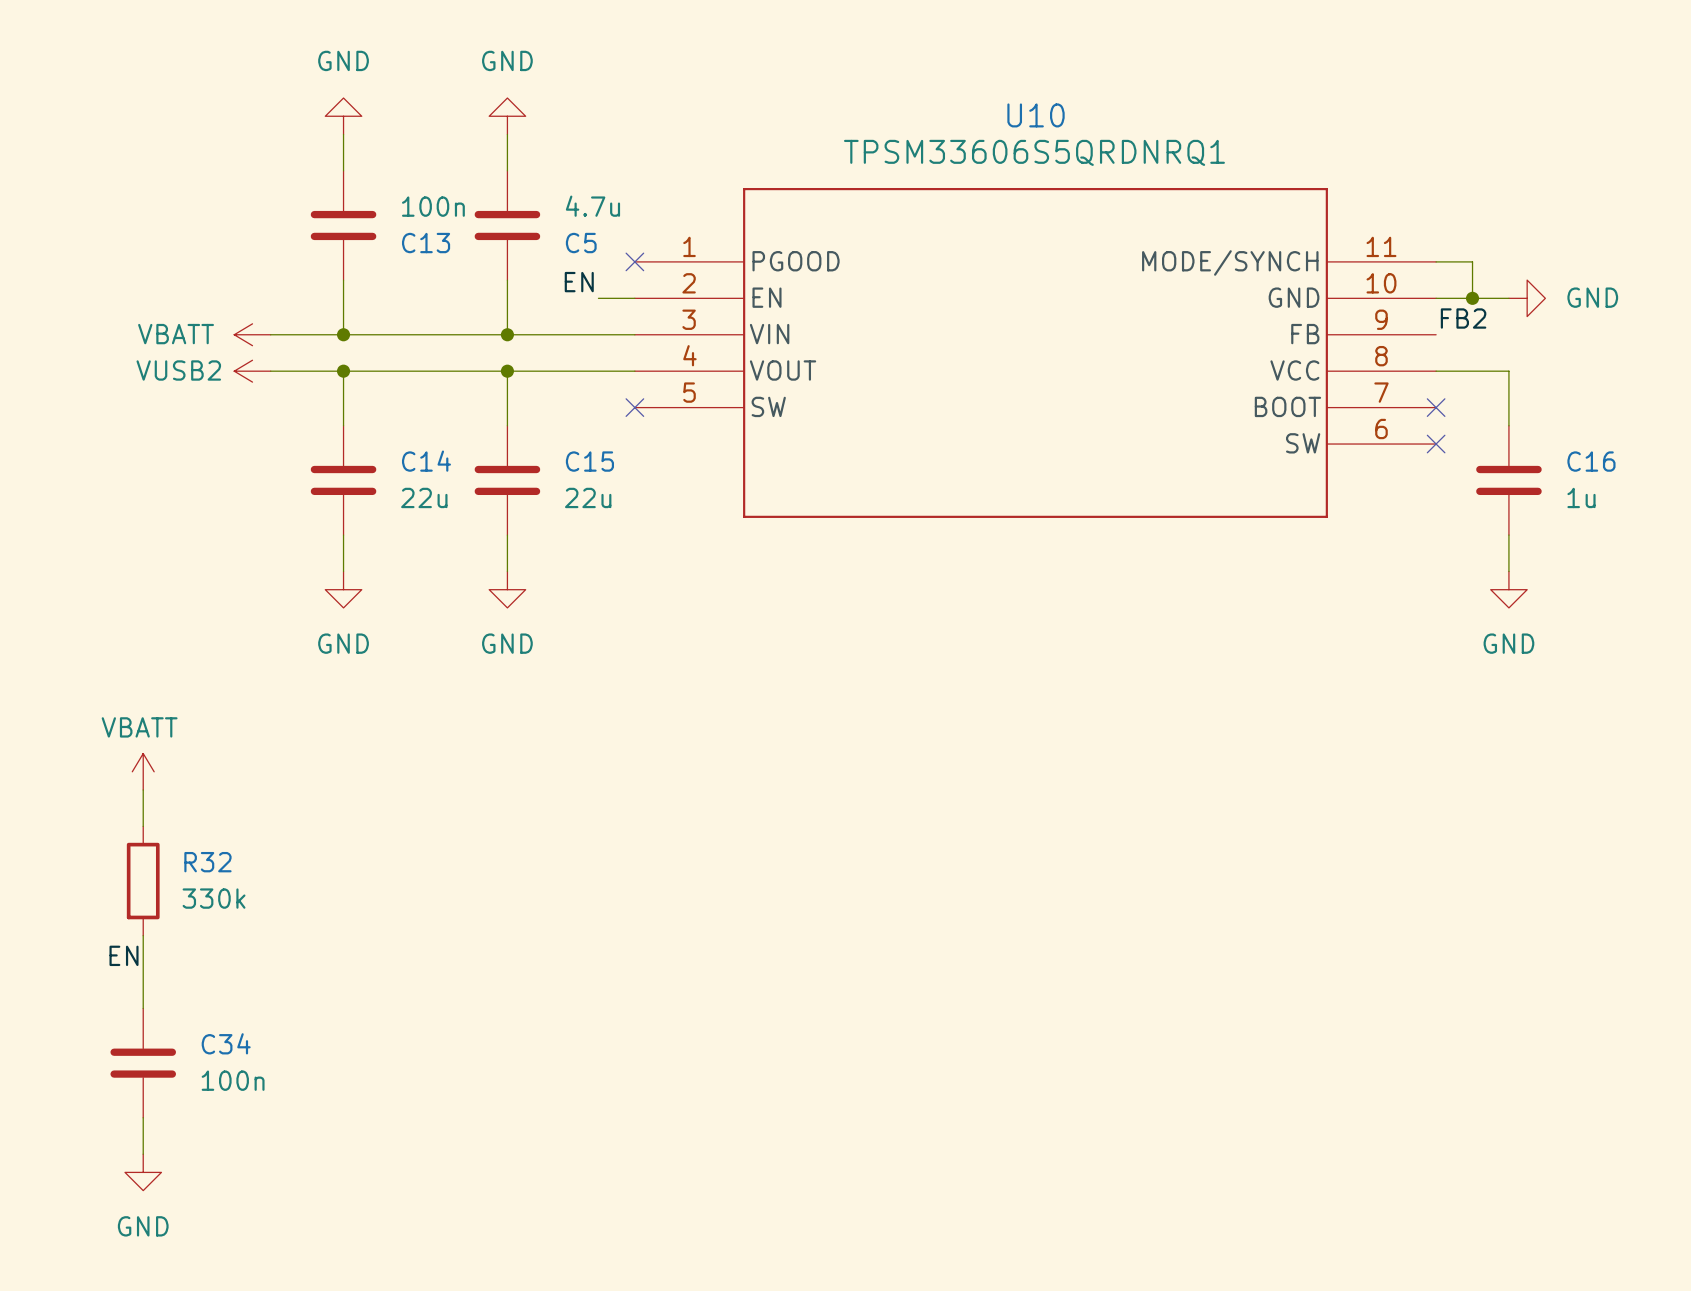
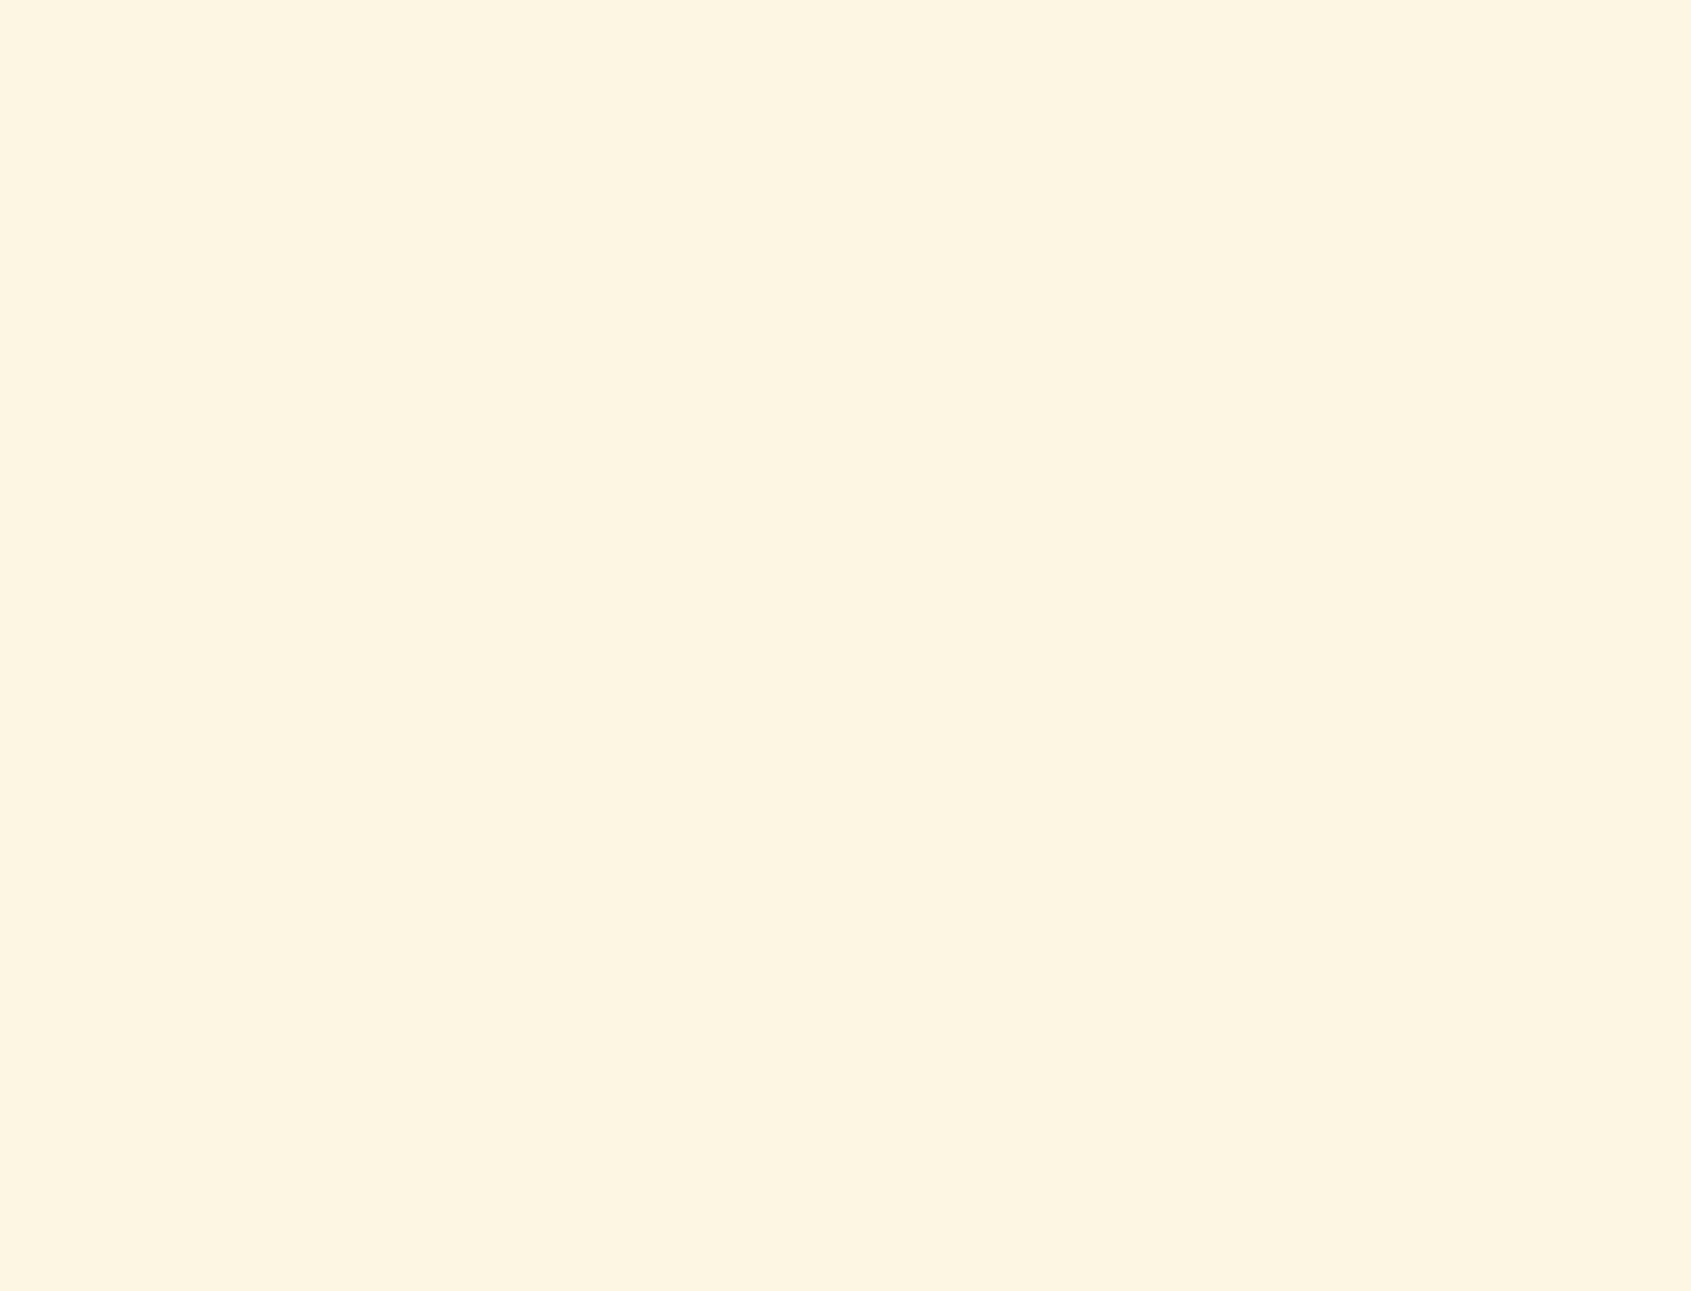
power symbol: GND (343, 116) -> none
power symbol: GND (507, 116) -> none
wire: (343, 134) (343, 170) -> none
wire: (507, 134) (507, 170) -> none
C13: 100n (343, 225) -> none
C5: 4.7u (507, 225) -> none
no-connect mark: (634, 261) -> none
wire: (1436, 261) (1472, 261) (1472, 298) -> none
wire: (343, 280) (343, 334) -> none
wire: (507, 280) (507, 334) -> none
label: EN (579, 282) -> none
wire: (598, 298) (634, 298) -> none
wire: (1436, 298) (1508, 298) -> none
junction: (1472, 298) -> none
power symbol: GND (1527, 298) -> none
label: FB2 (1463, 318) -> none
power symbol: VBATT (252, 334) -> none
wire: (270, 334) (634, 334) -> none
junction: (343, 334) -> none
junction: (507, 334) -> none
U10: TPSM33606S5QRDNRQ1 (1035, 352) -> none
power symbol: VUSB2 (252, 371) -> none
wire: (270, 371) (634, 371) -> none
wire: (343, 371) (343, 425) -> none
junction: (343, 371) -> none
wire: (507, 371) (507, 425) -> none
junction: (507, 371) -> none
wire: (1436, 371) (1508, 371) (1508, 425) -> none
no-connect mark: (634, 407) -> none
no-connect mark: (1436, 407) -> none
no-connect mark: (1436, 444) -> none
C14: 22u (343, 480) -> none
C15: 22u (507, 480) -> none
C16: 1u (1508, 480) -> none
wire: (343, 535) (343, 571) -> none
wire: (507, 535) (507, 571) -> none
wire: (1508, 535) (1508, 571) -> none
power symbol: GND (343, 589) -> none
power symbol: GND (507, 589) -> none
power symbol: GND (1508, 589) -> none
power symbol: VBATT (143, 771) -> none
wire: (143, 790) (143, 826) -> none
R32: 330k (143, 881) -> none
wire: (143, 935) (143, 1008) -> none
label: EN (124, 955) -> none
C34: 100n (143, 1063) -> none
wire: (143, 1117) (143, 1154) -> none
power symbol: GND (143, 1172) -> none

